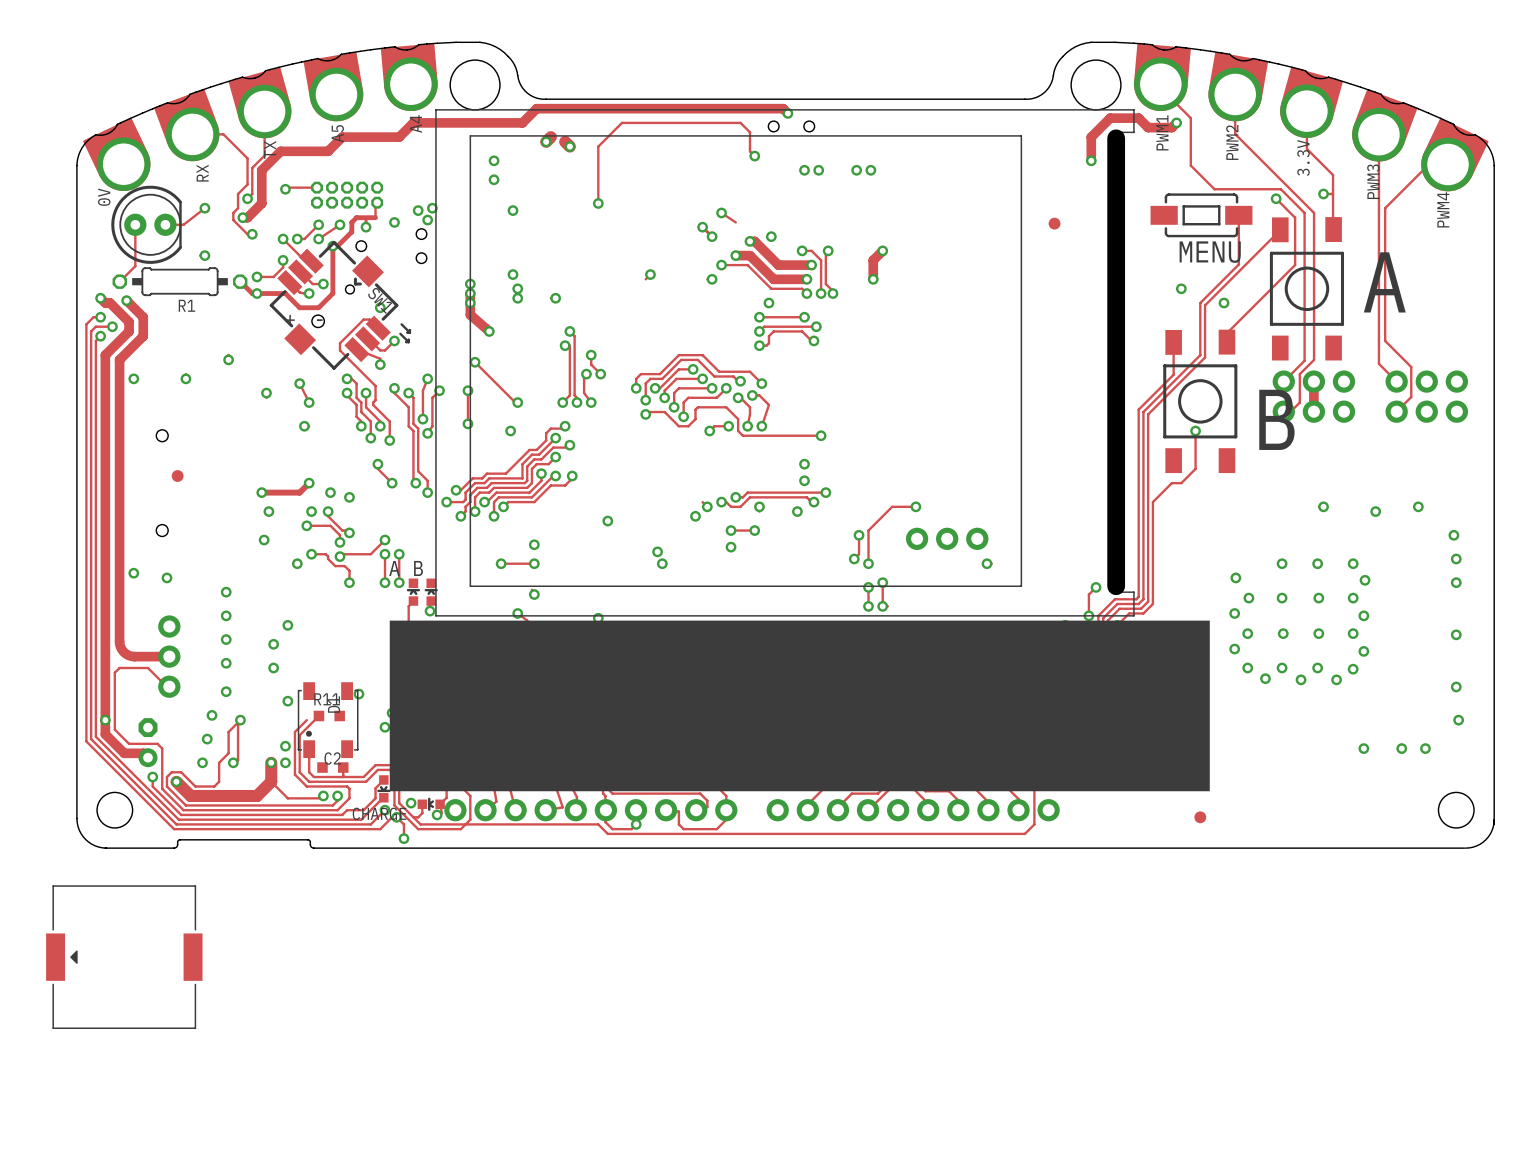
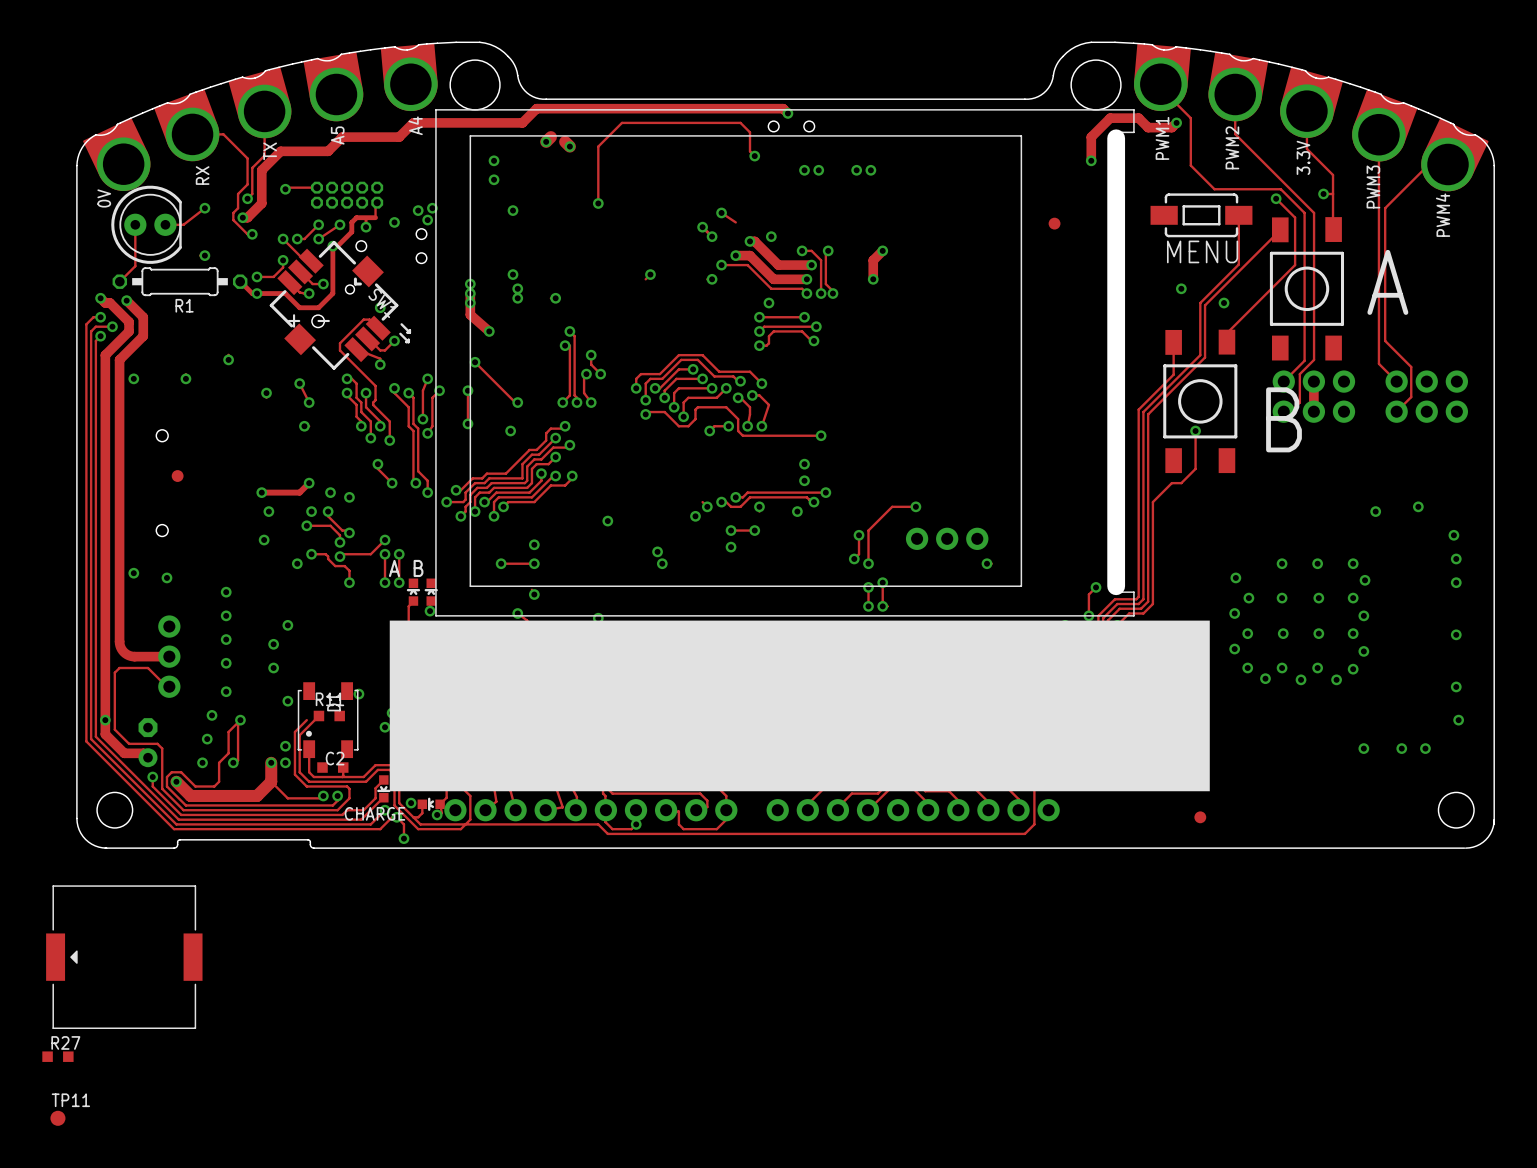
via: (1323, 506) -> none
R27: none -> (57, 1056)
TP11: none -> (57, 1118)

